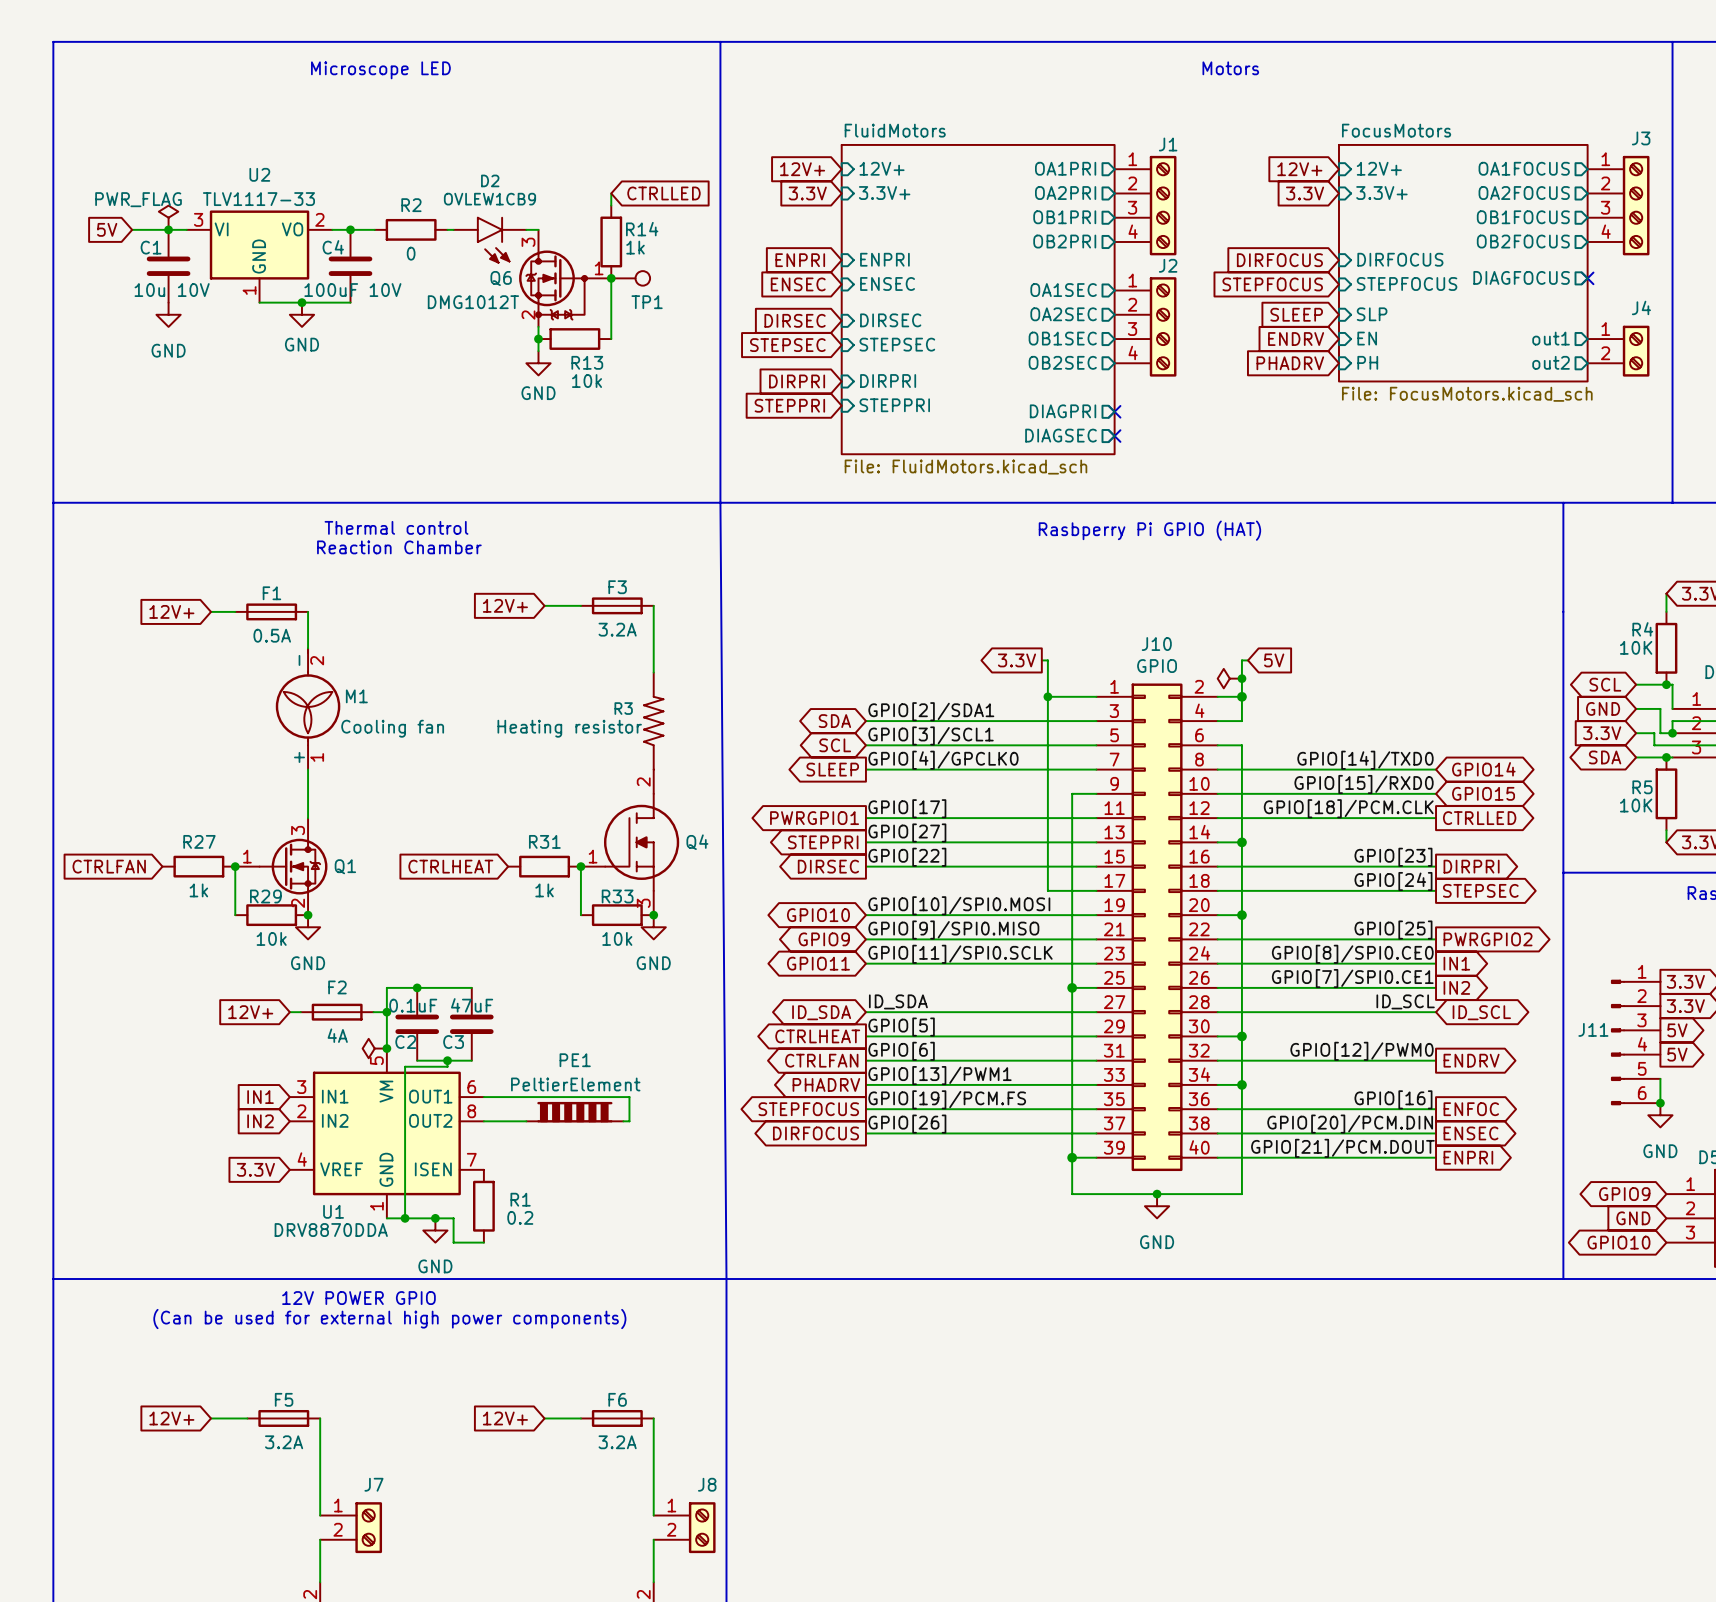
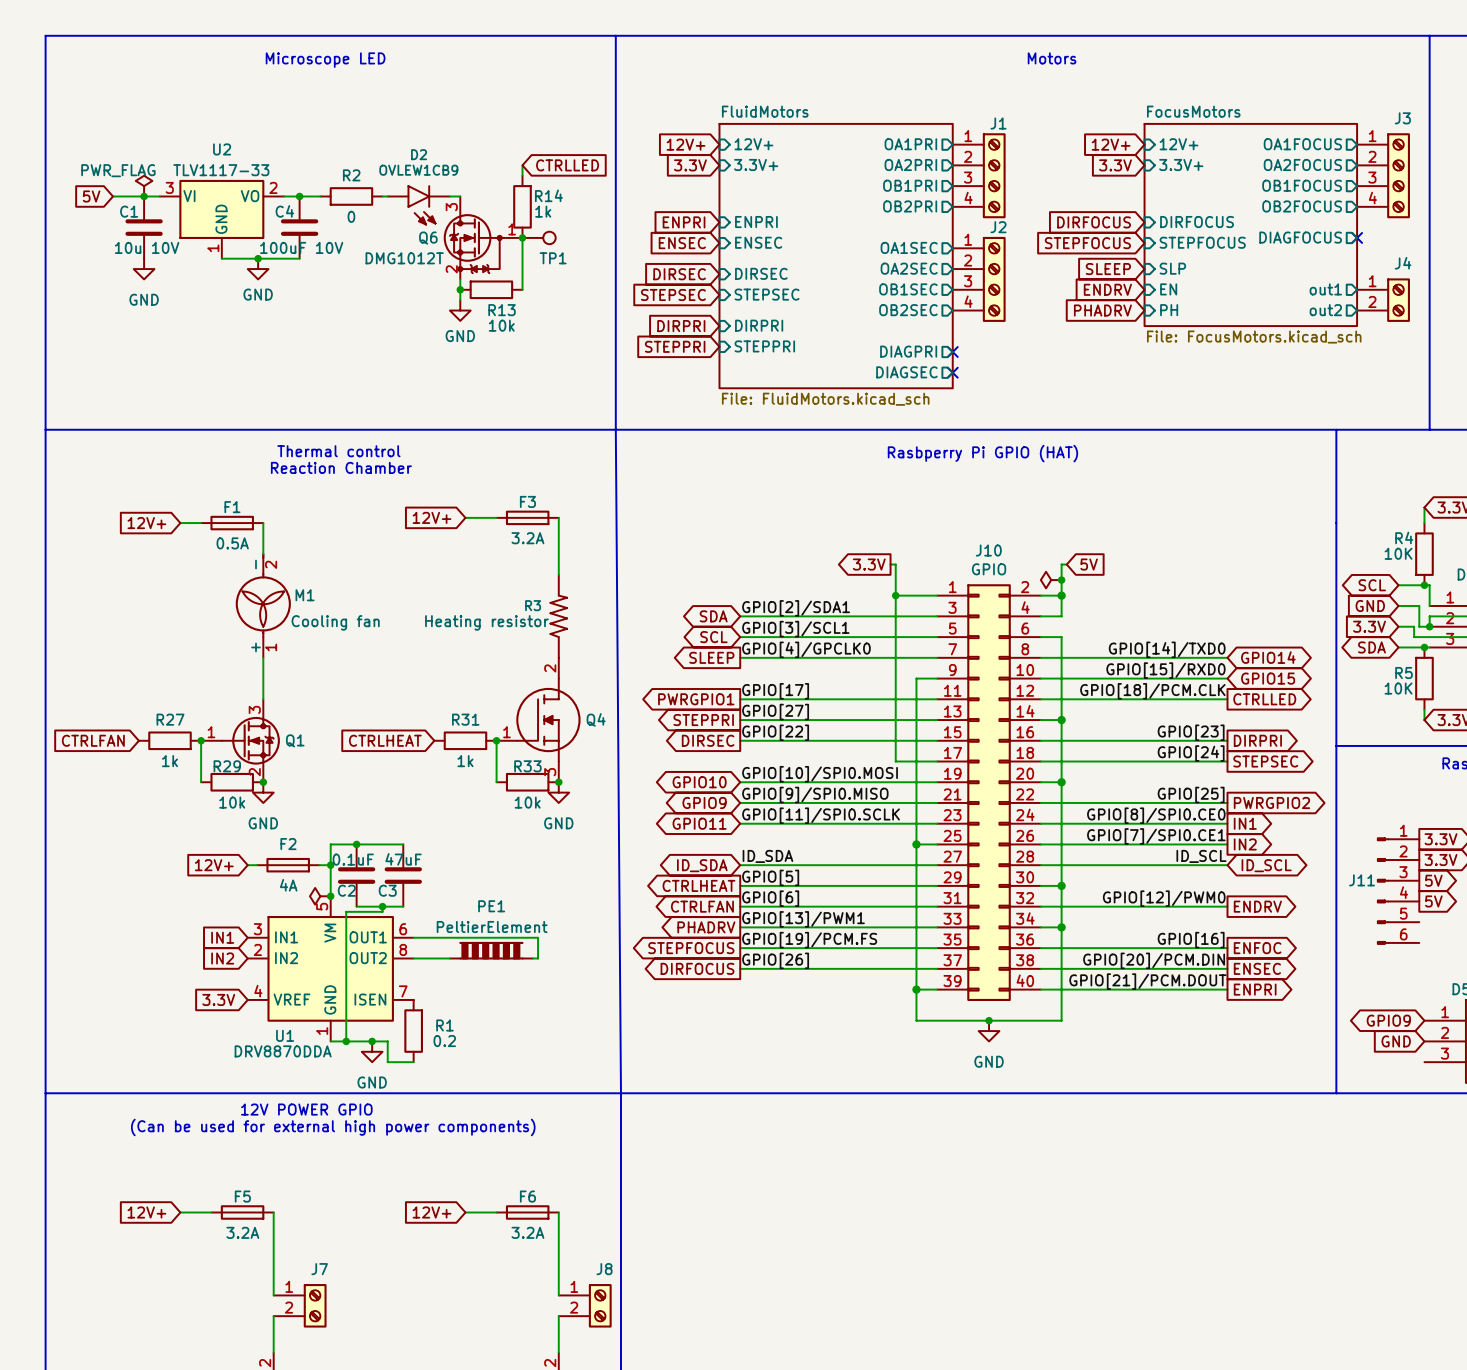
wire: (1660, 1078) (1660, 1103) -> none
junction: (1660, 1103) -> none
power symbol: GND (1660, 1115) -> none
global label: GPIO10 (1618, 1242) -> none

